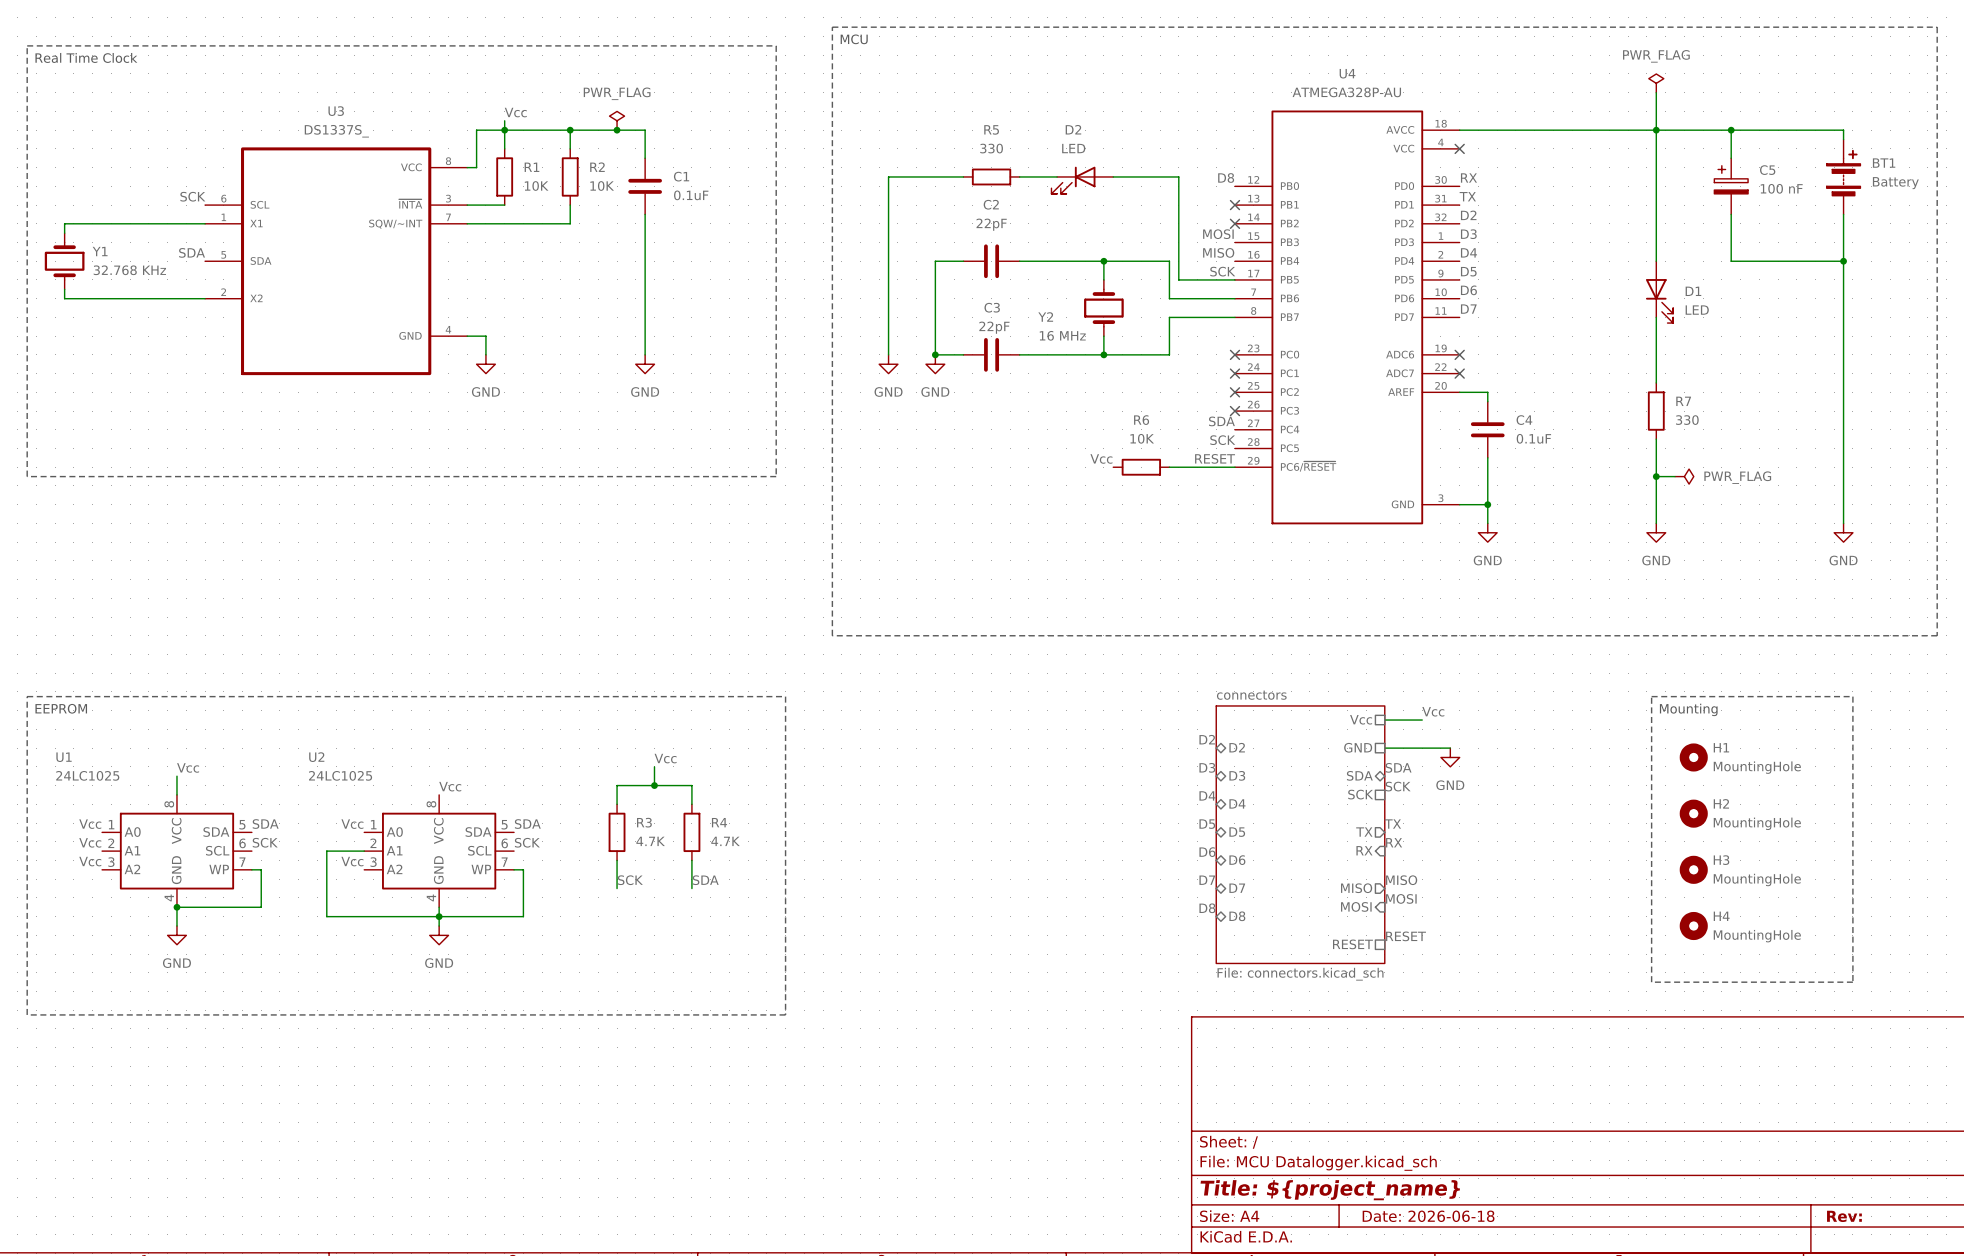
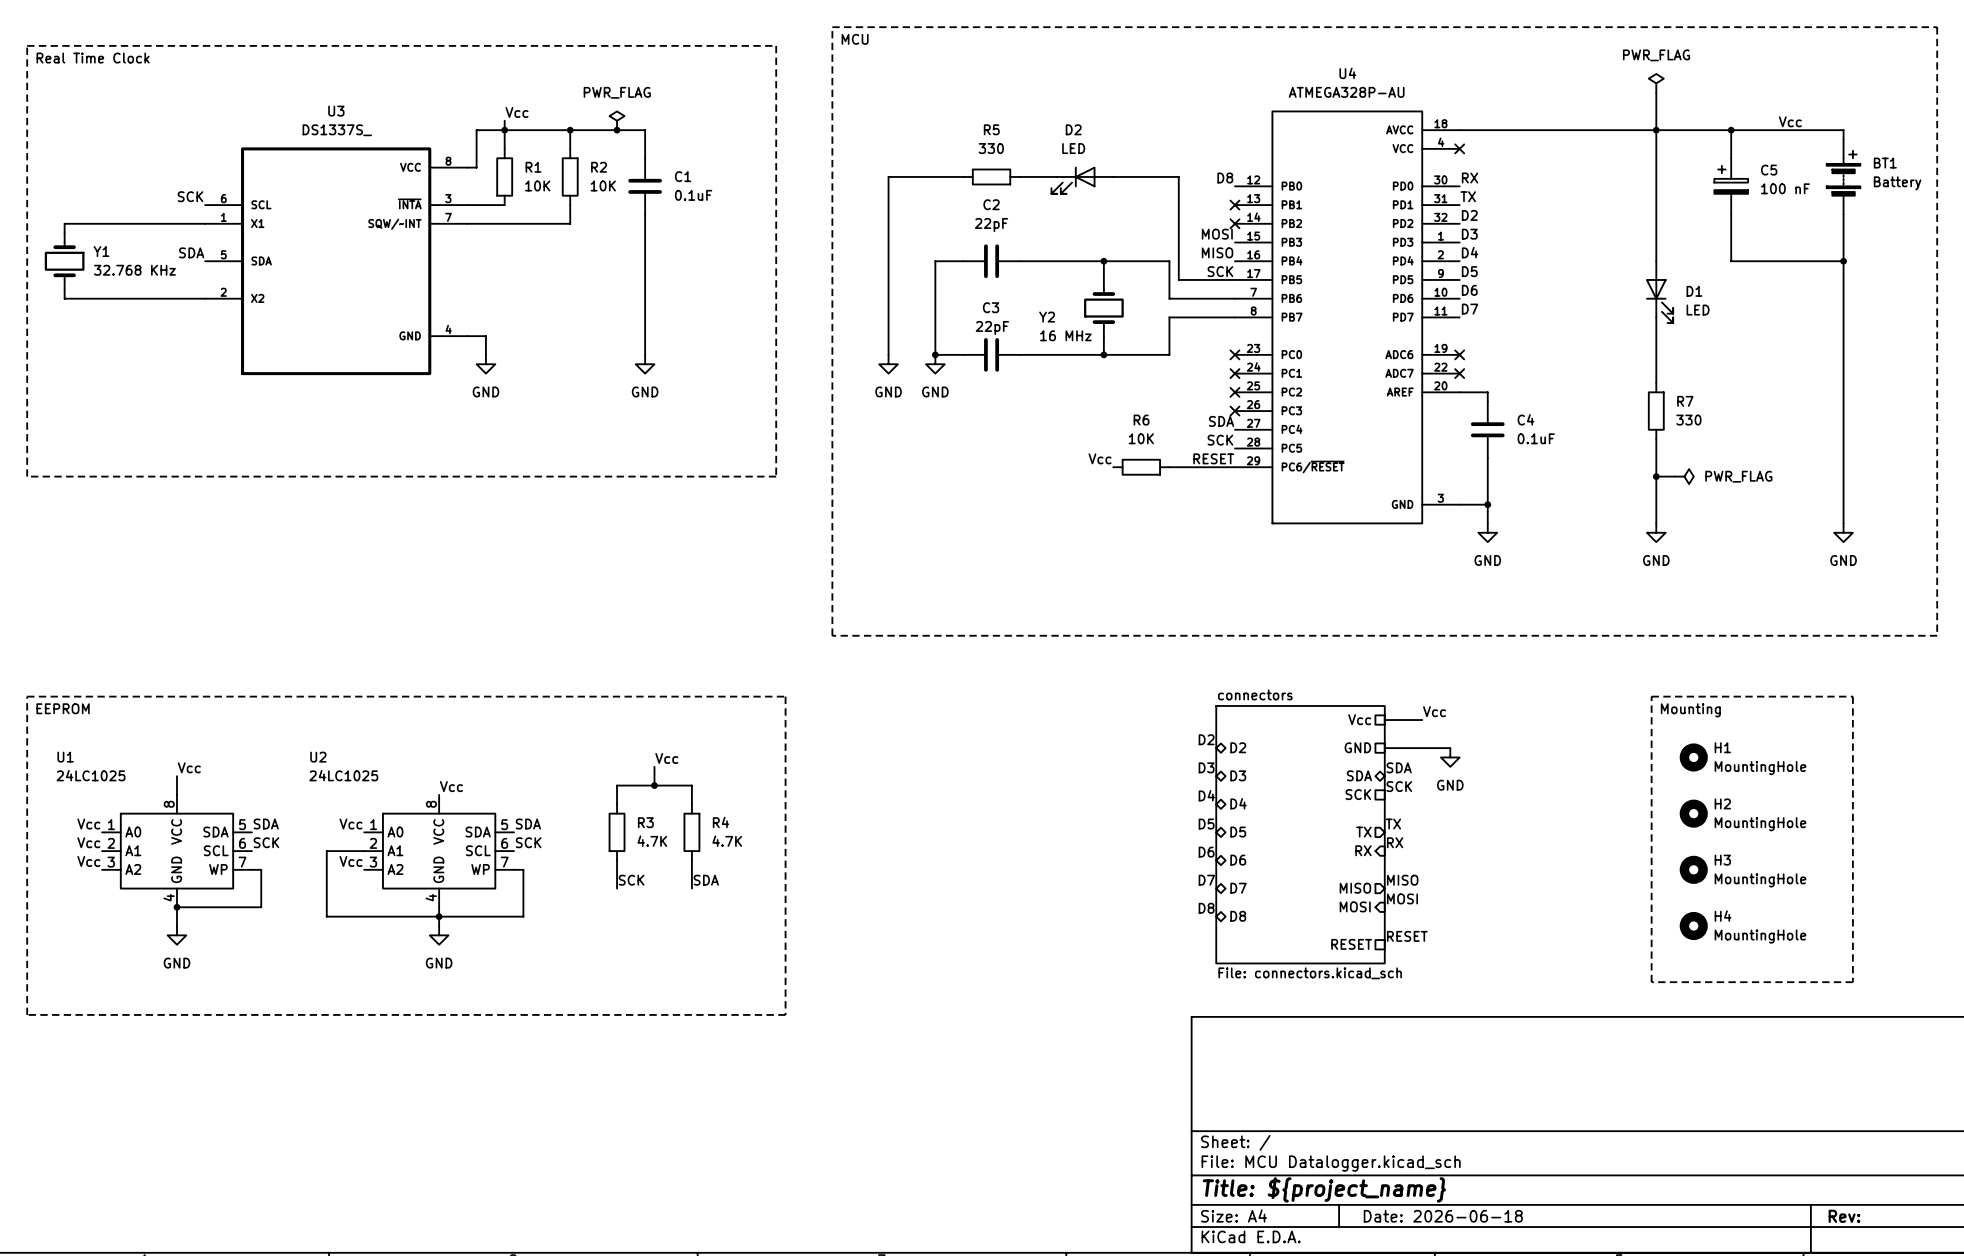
label: none -> Vcc (1790, 121)

